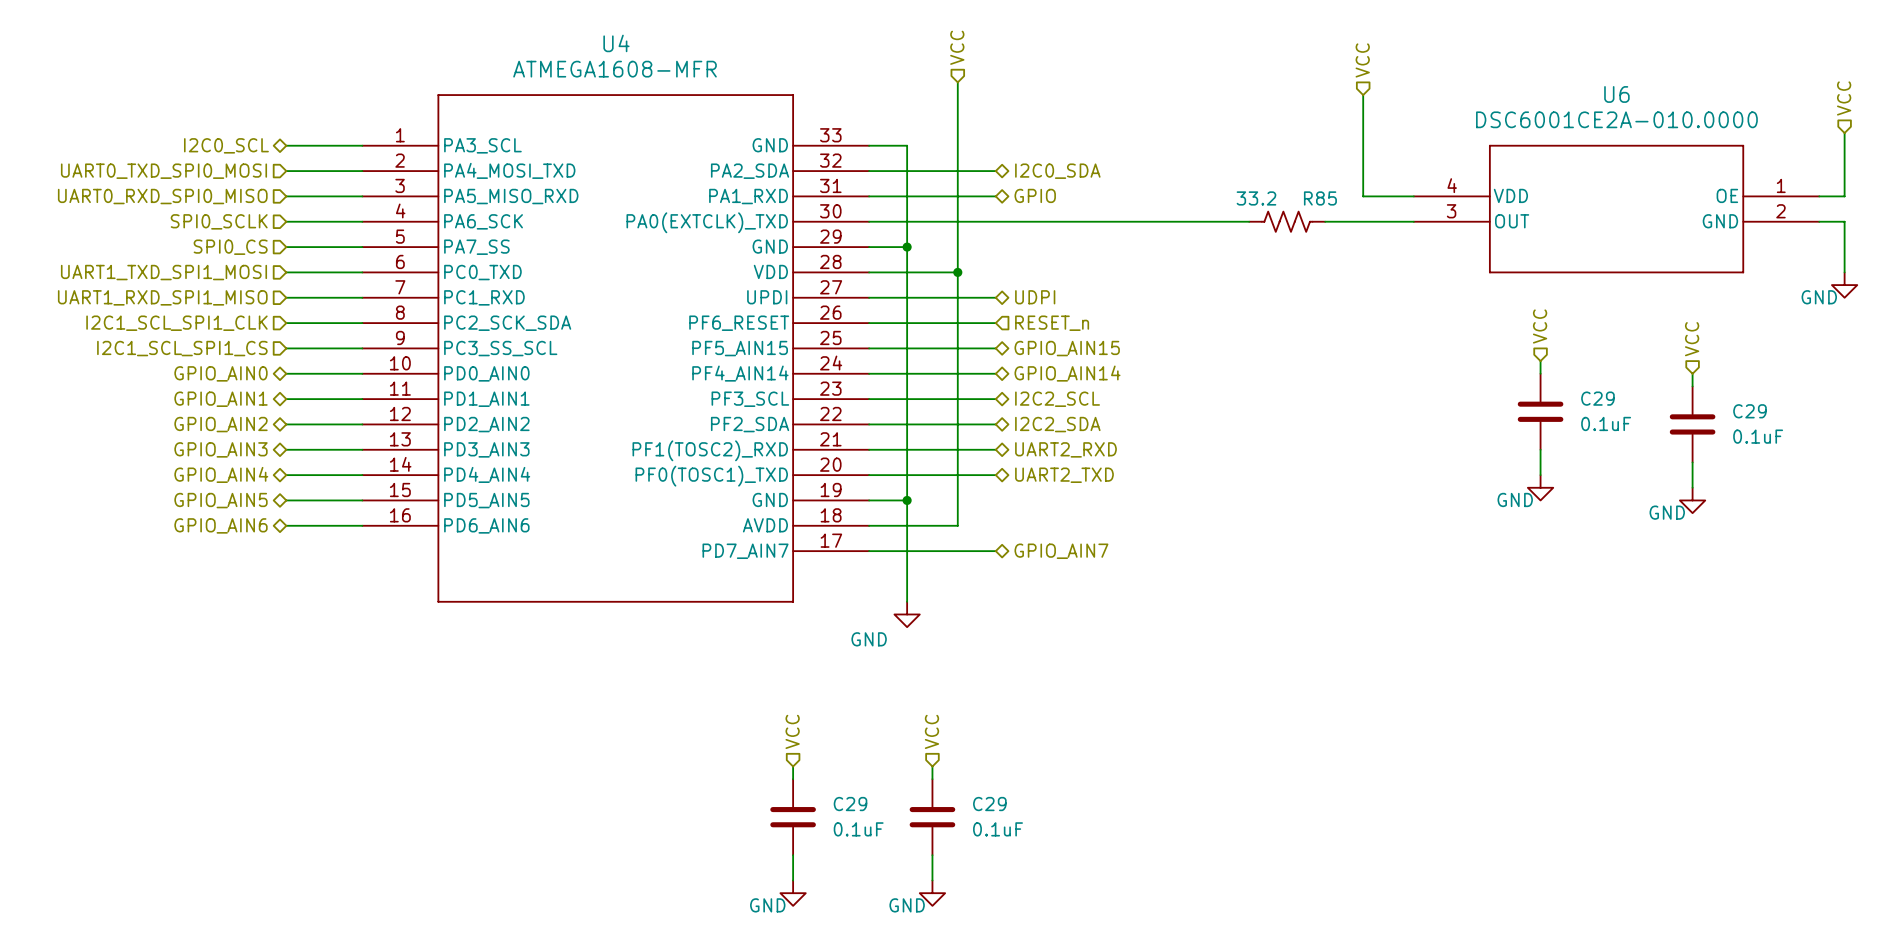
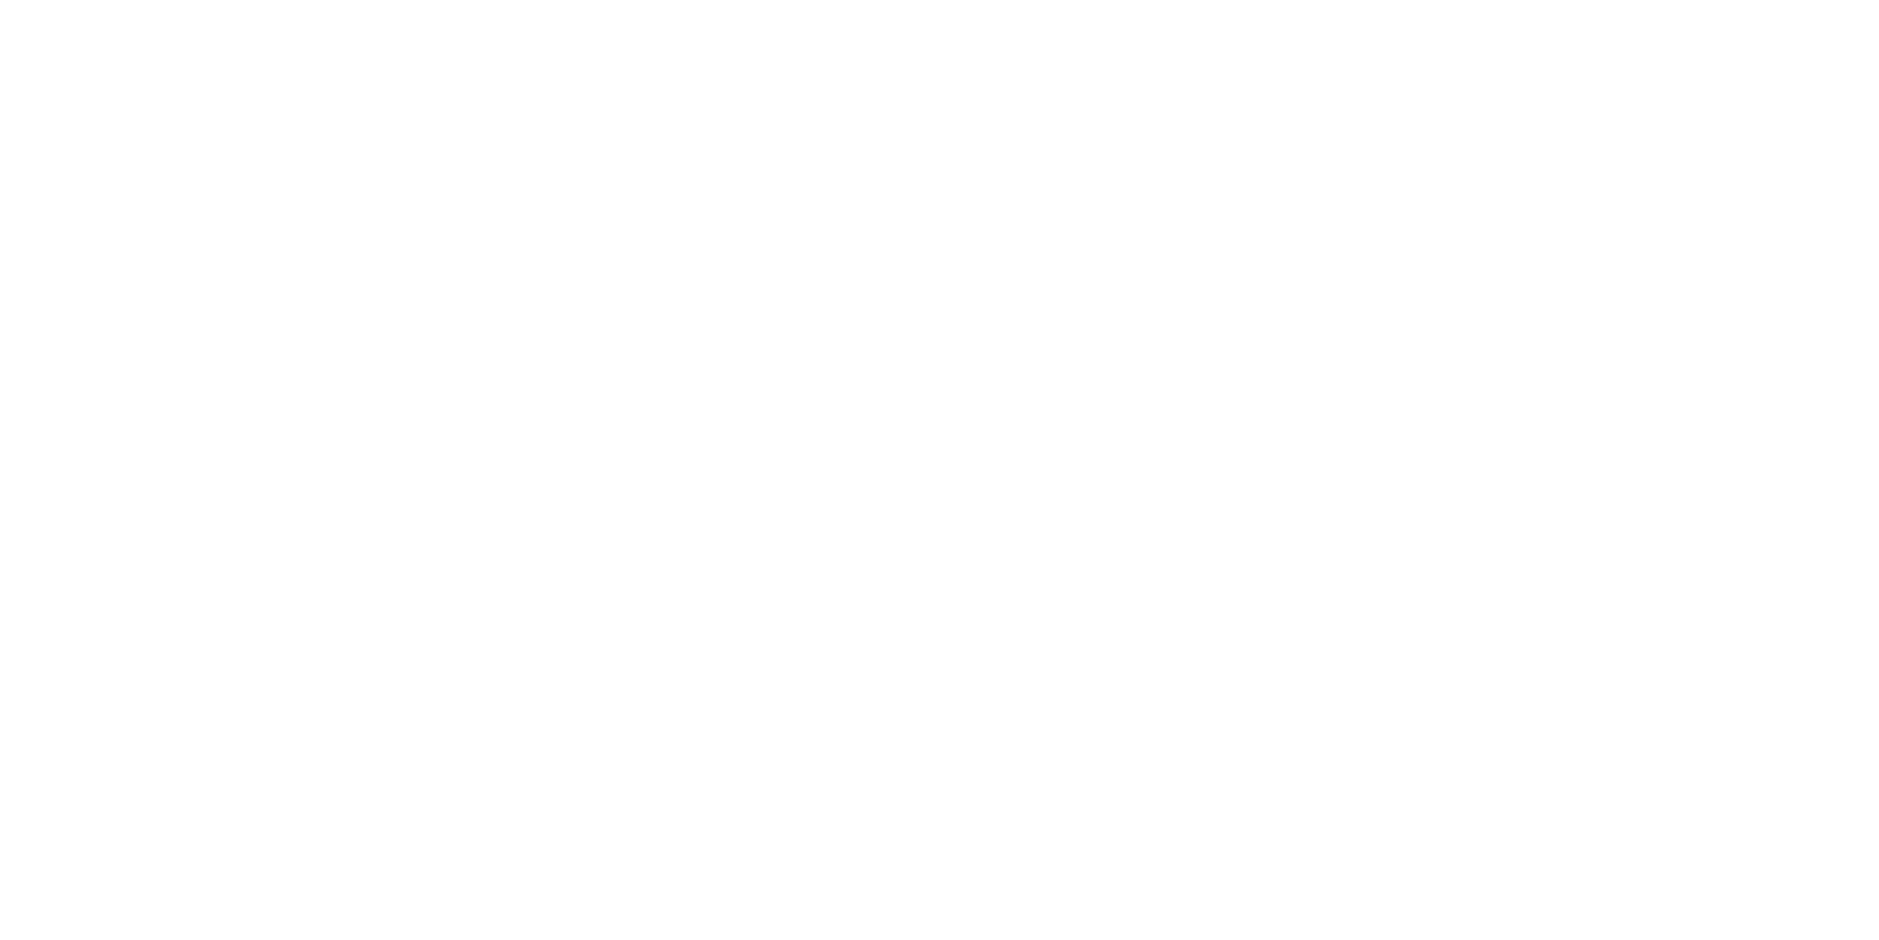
hierarchical label: VCC (957, 47) -> none
hierarchical label: VCC (1362, 60) -> none
wire: (957, 82) (957, 525) (869, 525) -> none
wire: (1363, 95) (1363, 196) (1413, 196) -> none
hierarchical label: VCC (1844, 98) -> none
wire: (1844, 133) (1844, 196) (1819, 196) -> none
hierarchical label: I2C0_SCL (226, 145) -> none
wire: (286, 145) (362, 145) -> none
wire: (869, 145) (907, 145) (907, 601) -> none
hierarchical label: UART0_TXD_SPI0_MOSI (163, 171) -> none
wire: (286, 171) (362, 171) -> none
wire: (869, 171) (995, 171) -> none
hierarchical label: I2C0_SDA (1057, 171) -> none
hierarchical label: GPIO (1035, 195) -> none
hierarchical label: UART0_RXD_SPI0_MISO (162, 196) -> none
wire: (286, 196) (362, 196) -> none
wire: (869, 196) (995, 196) -> none
U6: DSC6001CE2A-010.0000 (1616, 209) -> none
hierarchical label: SPI0_SCLK (219, 221) -> none
wire: (286, 221) (362, 221) -> none
wire: (869, 221) (1249, 221) -> none
R85: 33.2 (1287, 221) -> none
wire: (1325, 221) (1413, 221) -> none
wire: (1819, 221) (1844, 221) (1844, 272) -> none
hierarchical label: SPI0_CS (230, 247) -> none
wire: (286, 247) (362, 247) -> none
wire: (869, 247) (907, 247) -> none
junction: (907, 247) -> none
hierarchical label: UART1_TXD_SPI1_MOSI (163, 272) -> none
wire: (286, 272) (362, 272) -> none
wire: (869, 272) (957, 272) -> none
junction: (957, 272) -> none
power symbol: GND (1844, 285) -> none
hierarchical label: UART1_RXD_SPI1_MISO (162, 297) -> none
wire: (286, 297) (362, 297) -> none
wire: (869, 297) (995, 297) -> none
hierarchical label: UDPI (1035, 297) -> none
hierarchical label: I2C1_SCL_SPI1_CLK (176, 323) -> none
wire: (286, 323) (362, 323) -> none
wire: (869, 323) (995, 323) -> none
hierarchical label: RESET_n (1052, 323) -> none
hierarchical label: VCC (1540, 326) -> none
hierarchical label: VCC (1692, 339) -> none
hierarchical label: I2C1_SCL_SPI1_CS (182, 348) -> none
wire: (286, 348) (362, 348) -> none
U4: ATMEGA1608-MFR (615, 348) -> none
wire: (869, 348) (995, 348) -> none
hierarchical label: GPIO_AIN15 (1067, 348) -> none
wire: (1540, 361) (1540, 373) -> none
hierarchical label: GPIO_AIN0 (220, 373) -> none
wire: (286, 373) (362, 373) -> none
wire: (869, 373) (995, 373) -> none
hierarchical label: GPIO_AIN14 (1067, 373) -> none
wire: (1692, 373) (1692, 386) -> none
hierarchical label: GPIO_AIN1 (220, 399) -> none
wire: (286, 399) (362, 399) -> none
wire: (869, 399) (995, 399) -> none
hierarchical label: I2C2_SCL (1057, 399) -> none
C29: 0.1uF (1540, 411) -> none
hierarchical label: GPIO_AIN2 (220, 424) -> none
wire: (286, 424) (362, 424) -> none
wire: (869, 424) (995, 424) -> none
hierarchical label: I2C2_SDA (1057, 424) -> none
C29: 0.1uF (1692, 424) -> none
hierarchical label: GPIO_AIN3 (220, 449) -> none
wire: (286, 449) (362, 449) -> none
wire: (869, 449) (995, 449) -> none
hierarchical label: UART2_RXD (1065, 449) -> none
wire: (1540, 449) (1540, 475) -> none
wire: (1692, 462) (1692, 487) -> none
hierarchical label: GPIO_AIN4 (221, 474) -> none
wire: (286, 475) (362, 475) -> none
wire: (869, 475) (995, 475) -> none
hierarchical label: UART2_TXD (1064, 475) -> none
power symbol: GND (1540, 487) -> none
hierarchical label: GPIO_AIN5 (220, 500) -> none
wire: (286, 500) (362, 500) -> none
wire: (869, 500) (907, 500) -> none
junction: (907, 500) -> none
power symbol: GND (1692, 500) -> none
hierarchical label: GPIO_AIN6 (220, 525) -> none
wire: (286, 525) (362, 525) -> none
wire: (869, 551) (995, 551) -> none
hierarchical label: GPIO_AIN7 (1061, 551) -> none
power symbol: GND (907, 614) -> none
hierarchical label: VCC (792, 731) -> none
hierarchical label: VCC (931, 731) -> none
wire: (793, 766) (793, 779) -> none
wire: (932, 766) (932, 779) -> none
C29: 0.1uF (793, 817) -> none
C29: 0.1uF (932, 817) -> none
wire: (793, 855) (793, 880) -> none
wire: (932, 855) (932, 880) -> none
power symbol: GND (793, 893) -> none
power symbol: GND (932, 893) -> none

